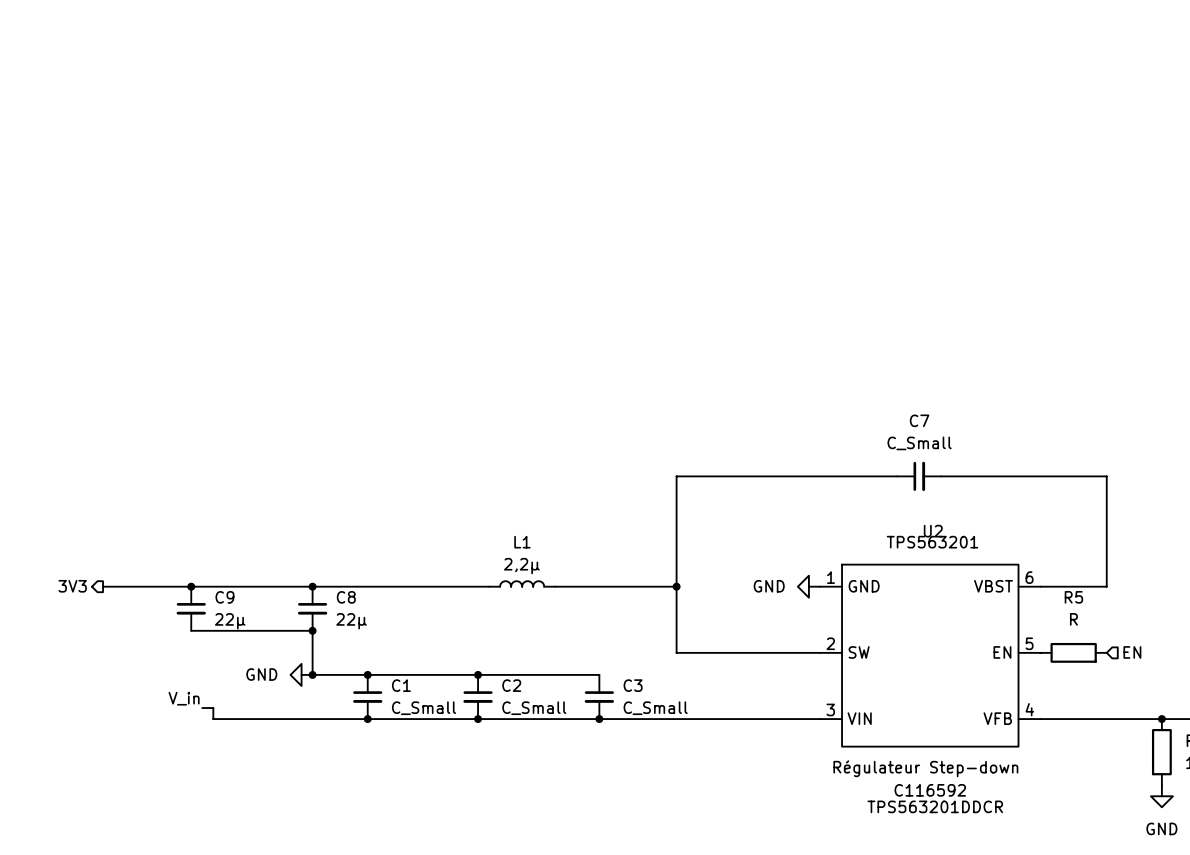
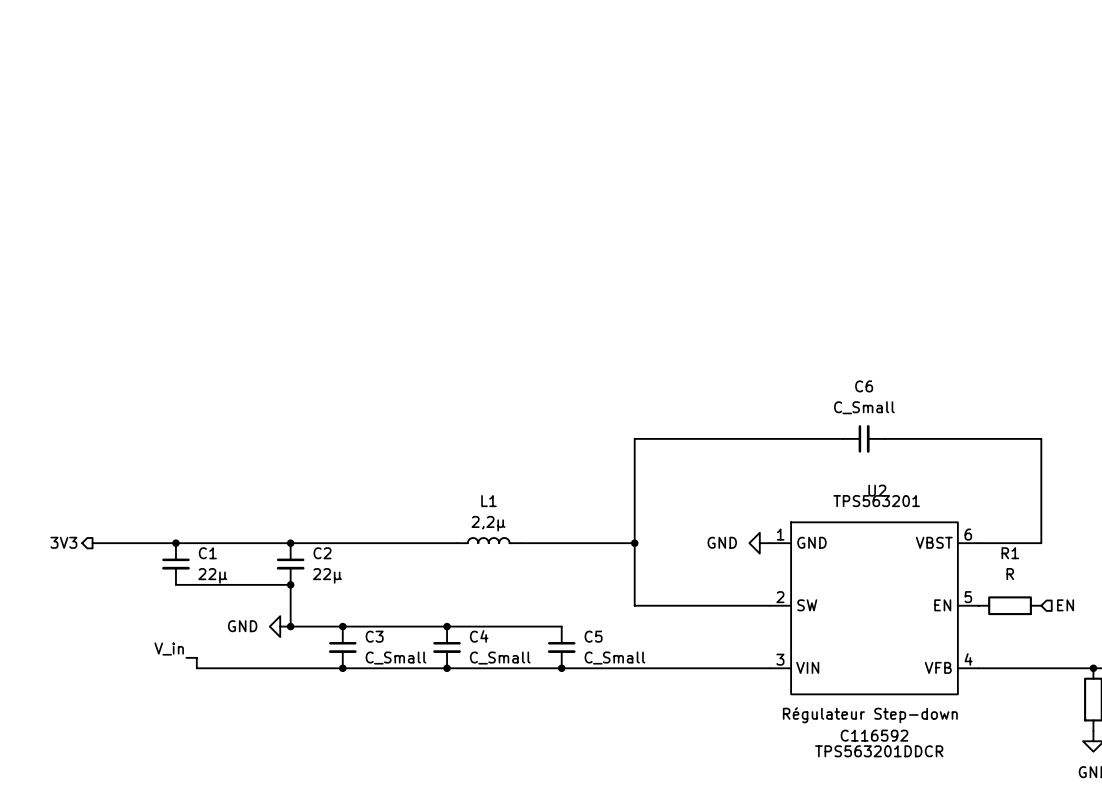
C7 name: C7 (919, 420) -> C6 (864, 386)
C9 name: C9 (224, 597) -> C1 (207, 553)
C8 name: C8 (346, 597) -> C2 (322, 553)
R5 name: R5 (1073, 597) -> R1 (1010, 553)
C1 name: C1 (401, 685) -> C3 (374, 636)
C2 name: C2 (511, 685) -> C4 (479, 636)
C3 name: C3 (633, 685) -> C5 (593, 636)

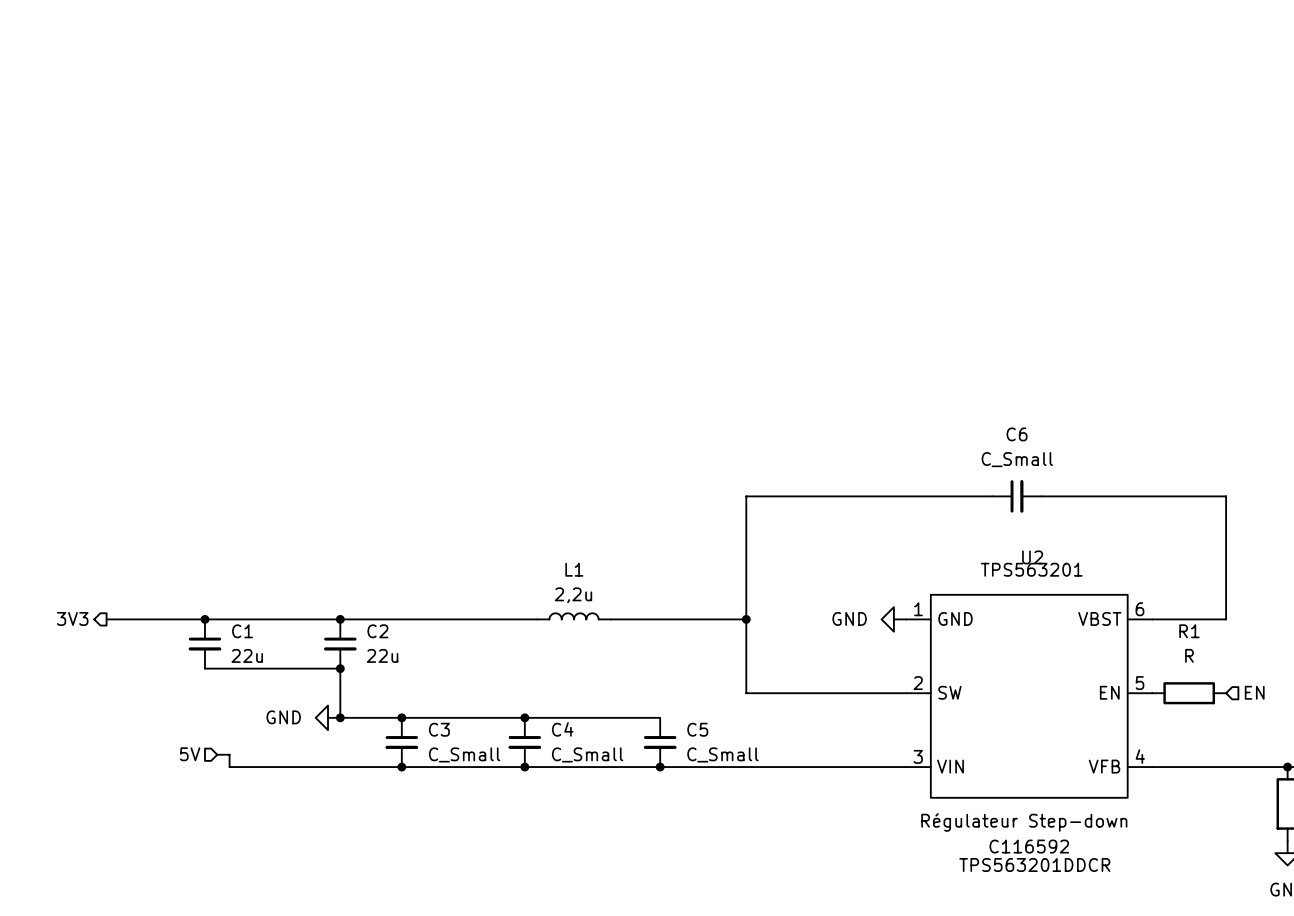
L1 value: 2,2µ (488, 523) -> 2,2u (573, 595)
C1 value: 22µ (212, 575) -> 22u (247, 655)
C2 value: 22µ (327, 575) -> 22u (382, 655)
label: V_in (169, 649) -> none
hierarchical label: none -> 5V (190, 754)

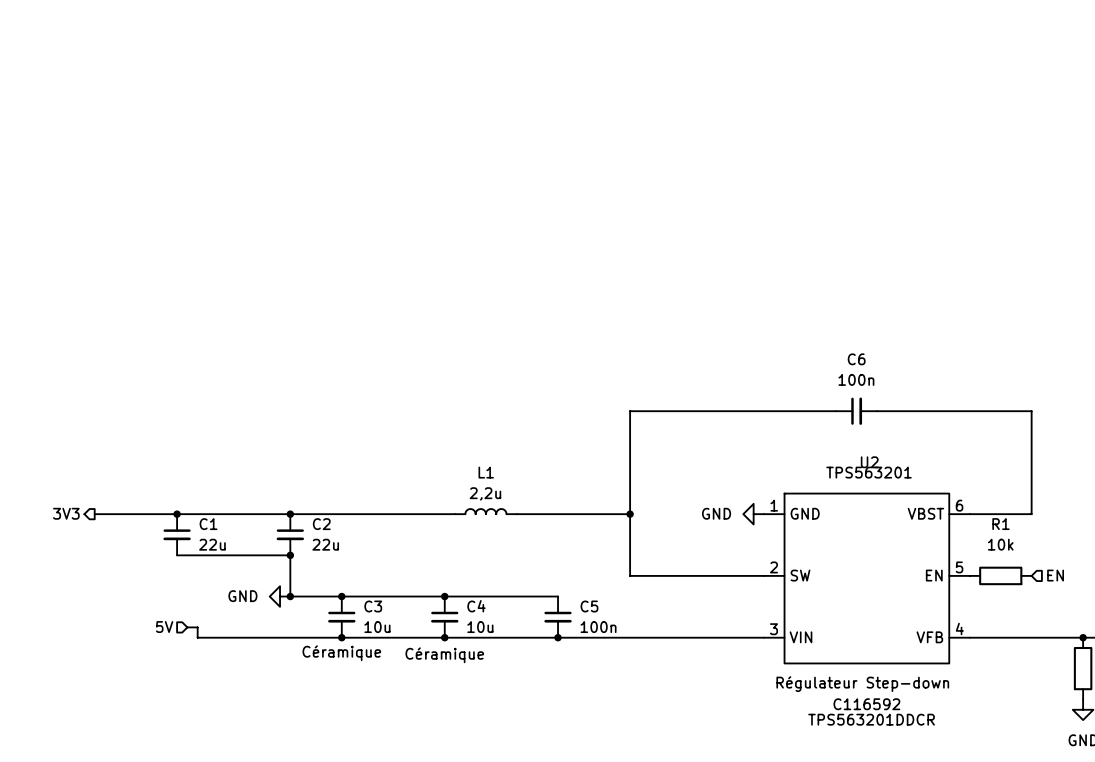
C6 value: C_Small (1017, 459) -> 100n (856, 379)
R1 value: R (1189, 655) -> 10k (1000, 544)
C3 value: C_Small (464, 754) -> 10u (377, 627)
C4 value: C_Small (587, 754) -> 10u (480, 627)
C5 value: C_Small (722, 754) -> 100n (598, 627)
C3 text: none -> Céramique (341, 653)
C4 text: none -> Céramique (444, 655)

